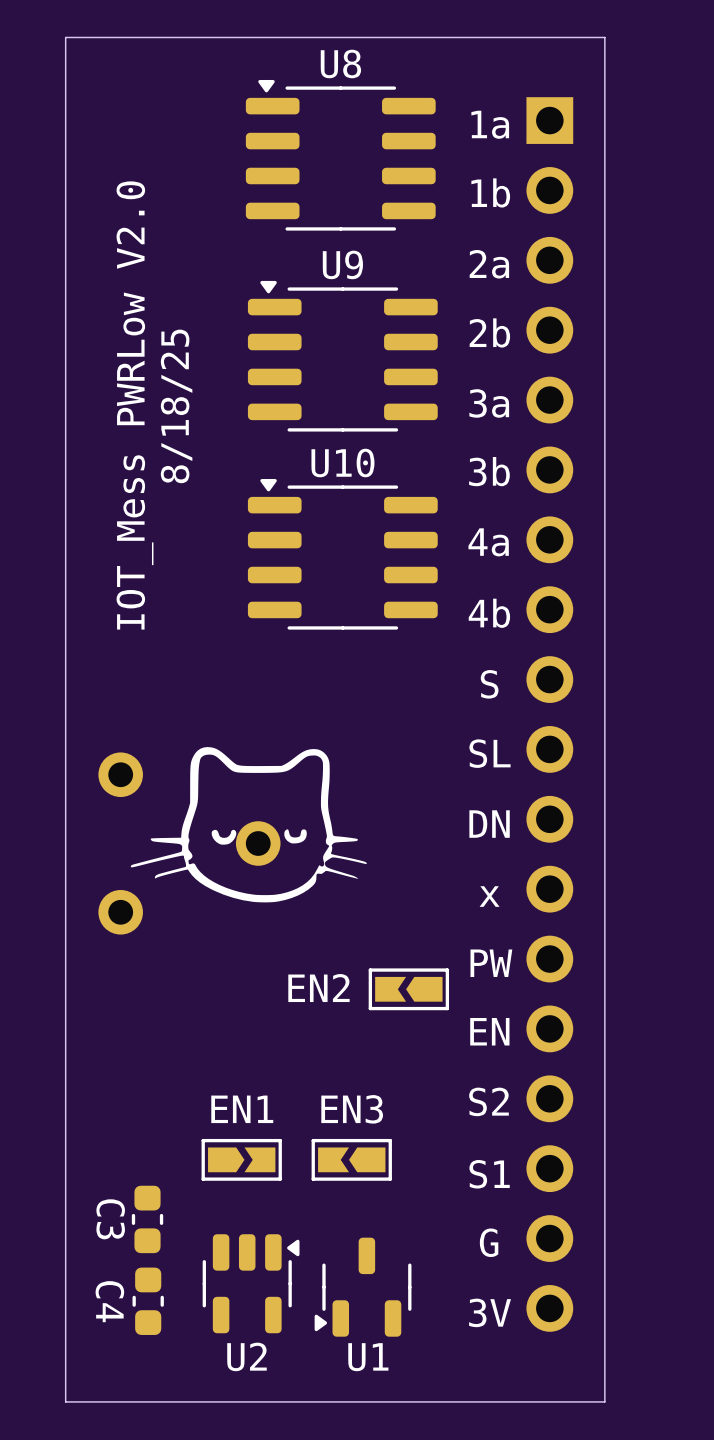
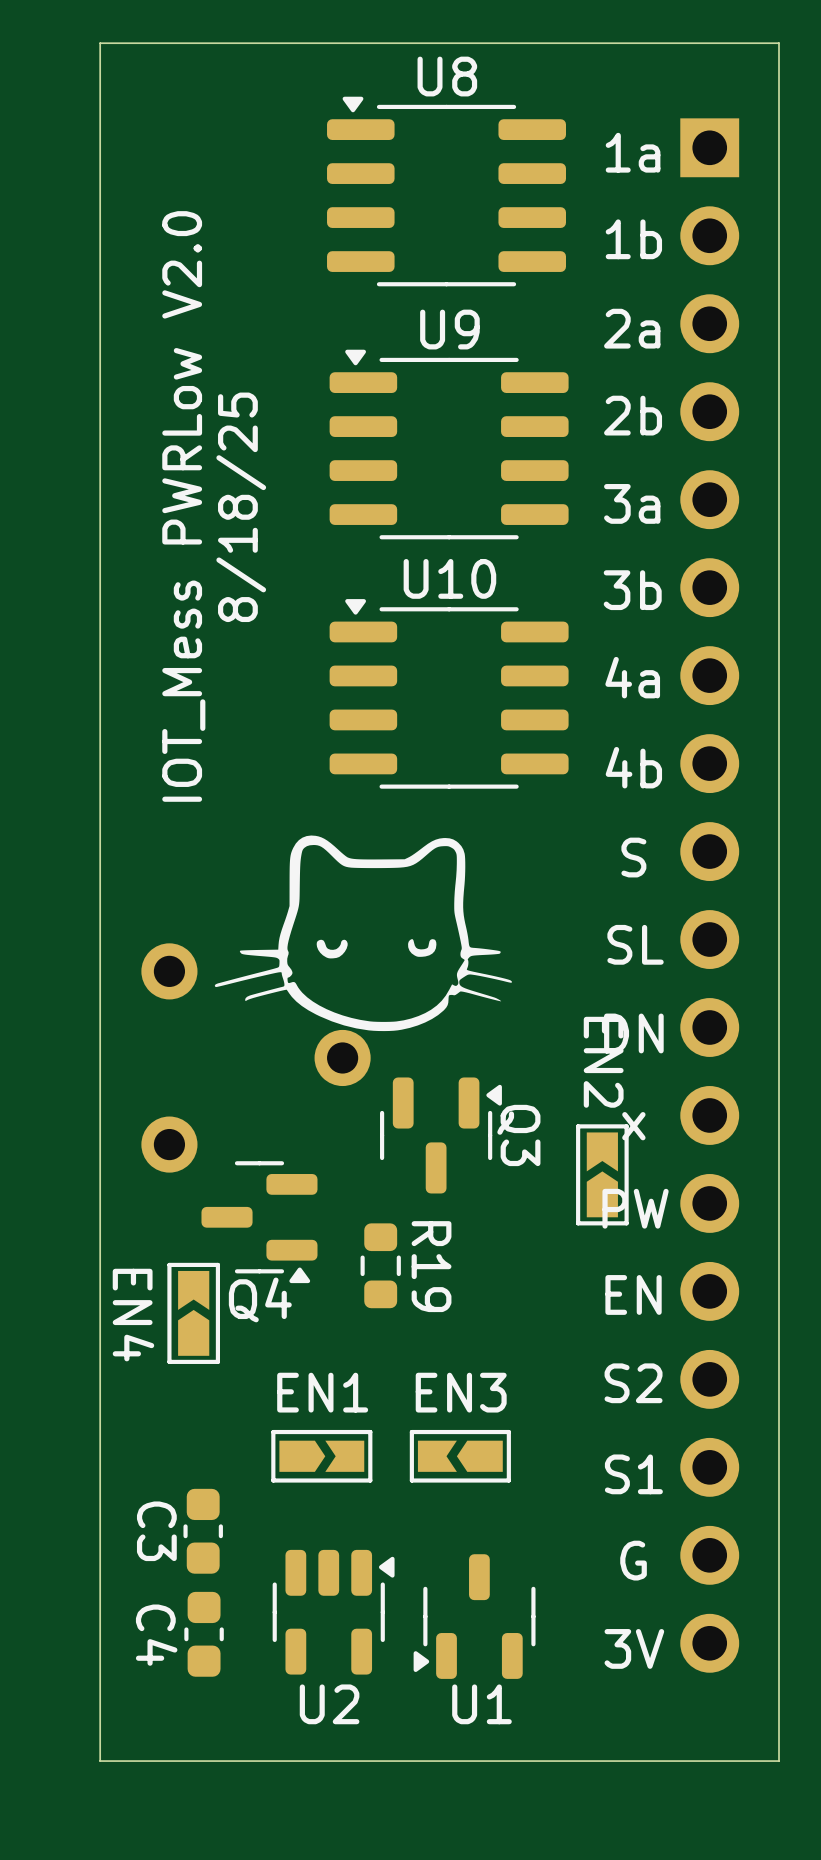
drawing position: (248, 824) -> (363, 933)
Q3: none -> (440, 1135)
Q4: none -> (259, 1222)
EN2 rotation: 0° (408, 989) -> 90° clockwise (602, 1174)
EN2 position: (408, 989) -> (602, 1174)
R19: none -> (380, 1265)
EN4: none -> (193, 1313)

